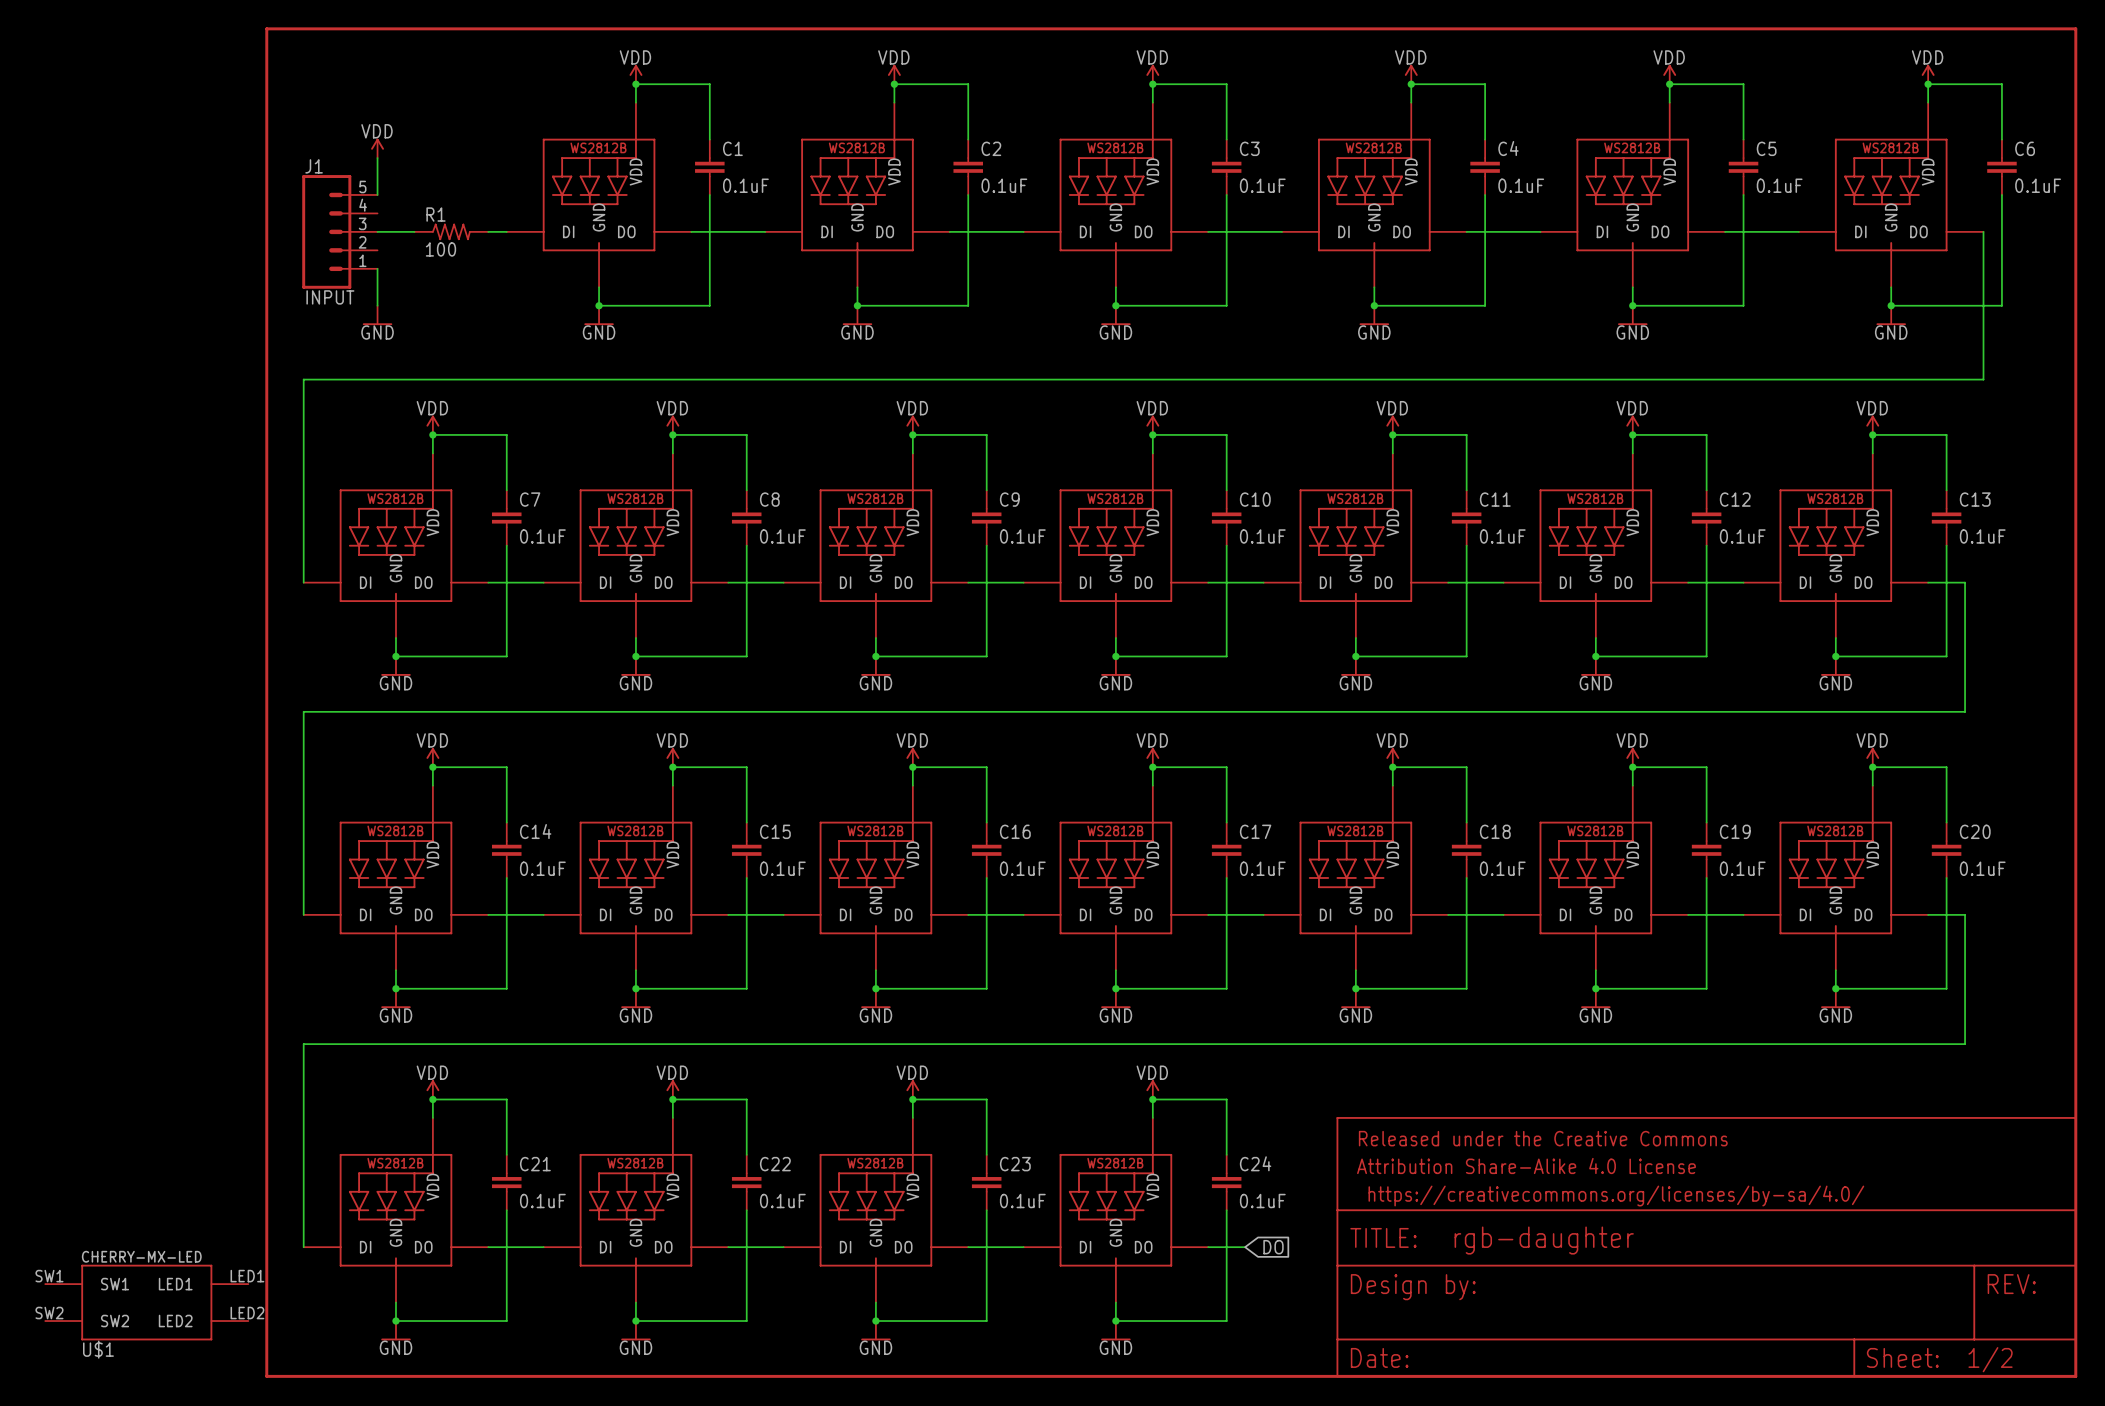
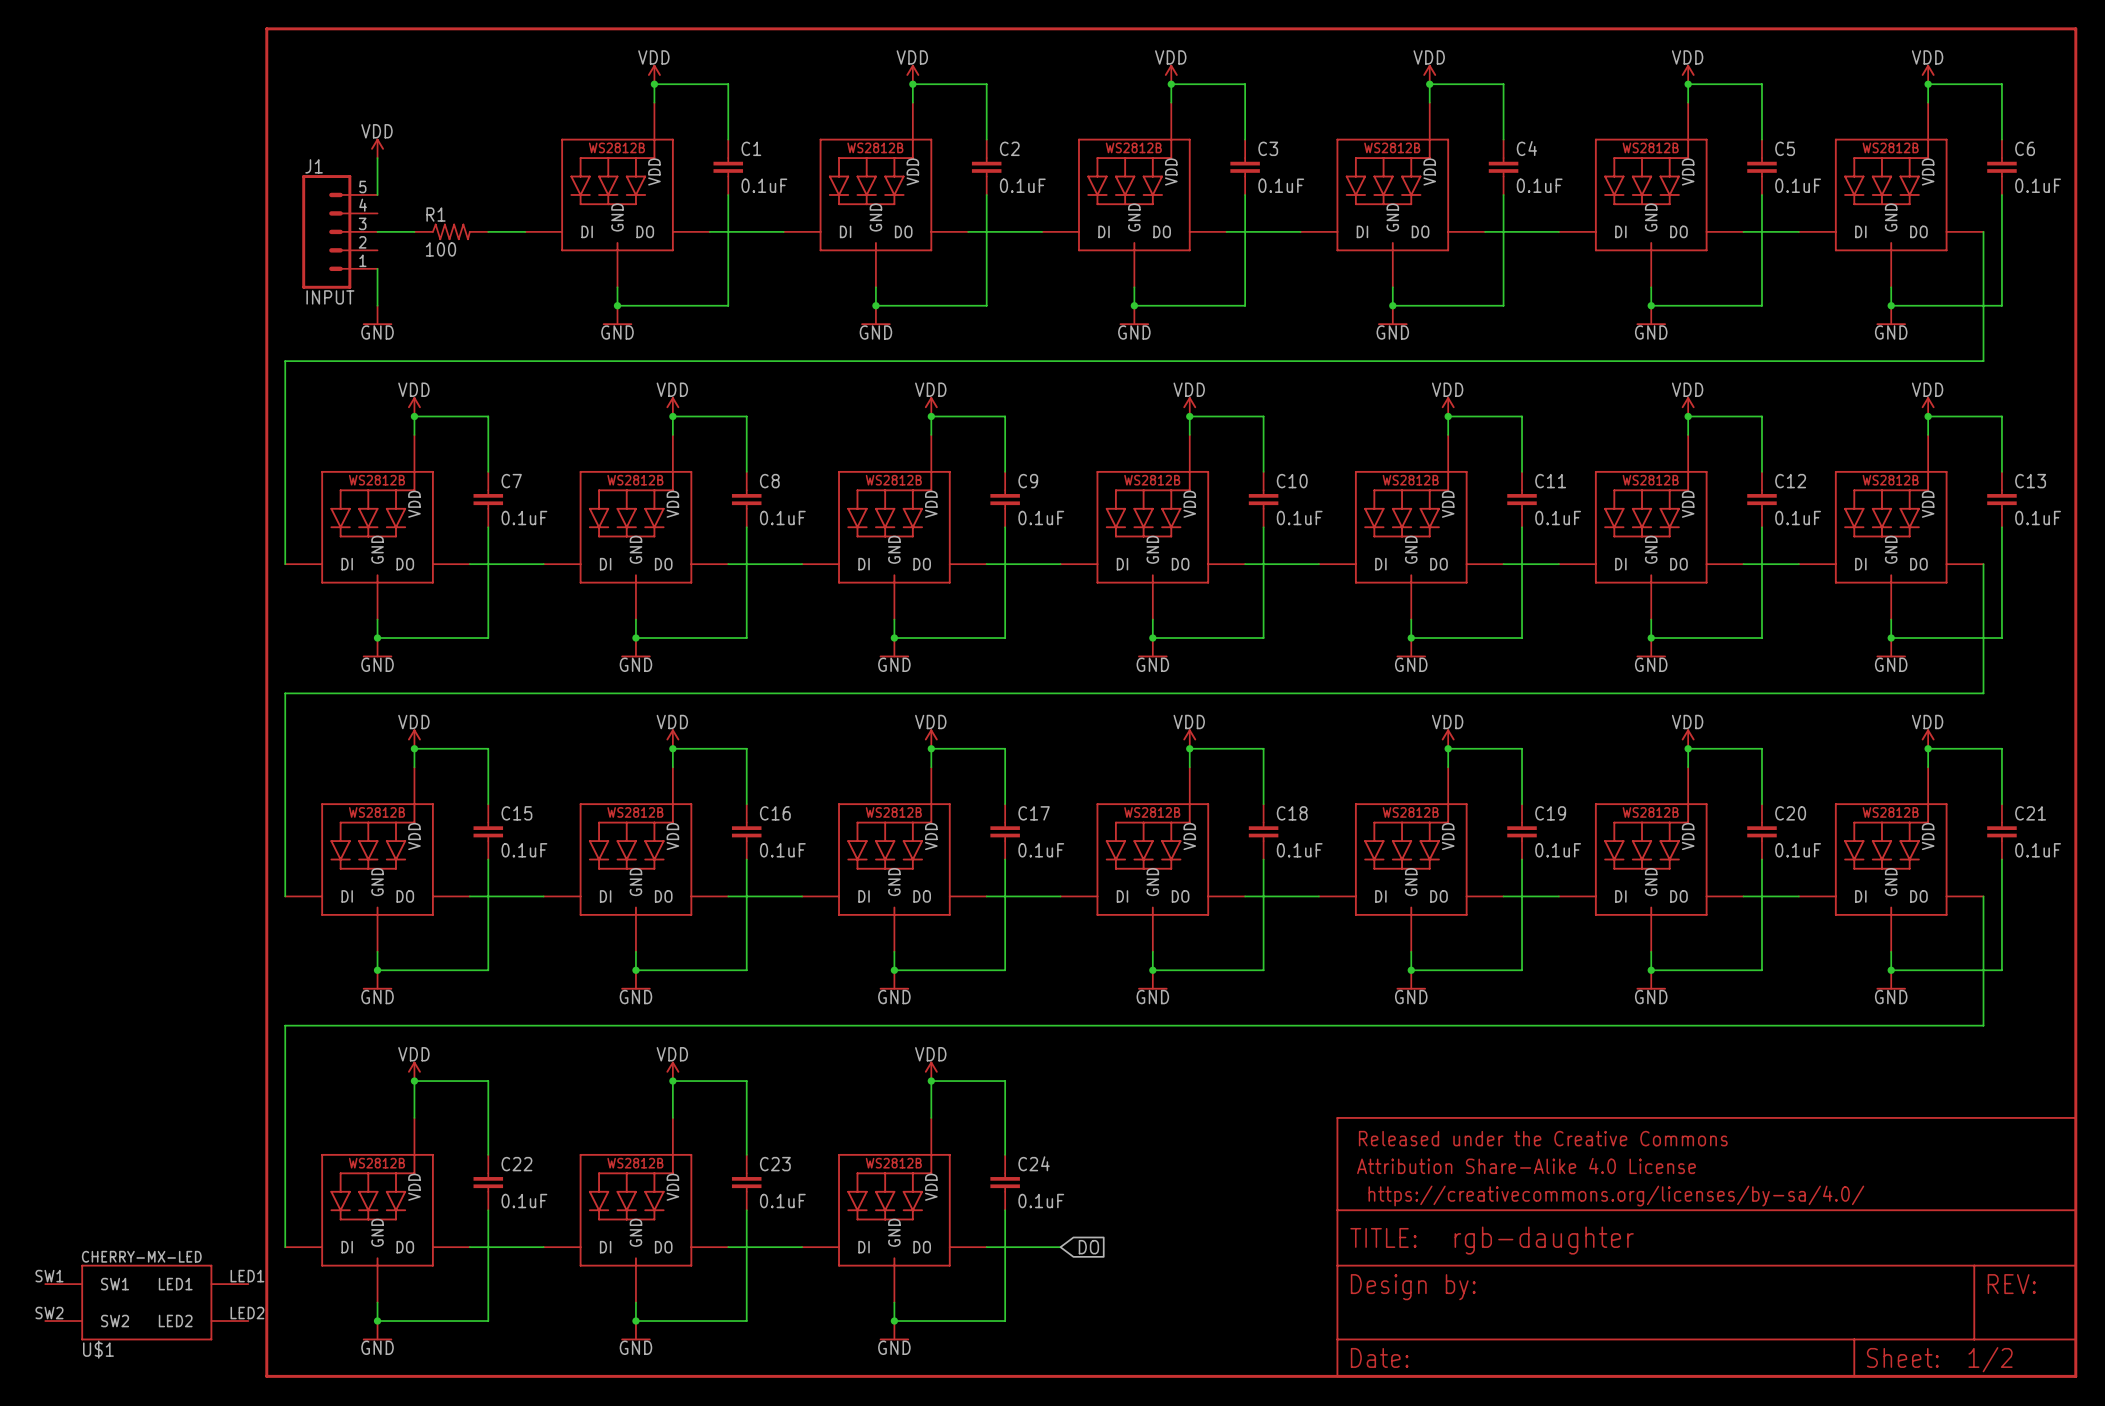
power symbol position: VDD (635, 74) -> VDD (654, 74)
power symbol position: VDD (894, 74) -> VDD (912, 74)
power symbol position: VDD (1152, 74) -> VDD (1171, 74)
power symbol position: VDD (1411, 74) -> VDD (1429, 74)
power symbol position: VDD (1669, 74) -> VDD (1688, 74)
junction position: (635, 84) -> (654, 84)
wire: (654, 84) (635, 84) (635, 102) -> (654, 84) (654, 102)
wire: (709, 84) (709, 139) -> (709, 84) (728, 84) (728, 139)
junction position: (894, 84) -> (912, 84)
wire: (912, 84) (894, 84) (894, 102) -> (912, 84) (912, 102)
wire: (968, 84) (968, 139) -> (968, 84) (986, 84) (986, 139)
junction position: (1152, 84) -> (1171, 84)
wire: (1171, 84) (1152, 84) (1152, 102) -> (1171, 84) (1171, 102)
wire: (1226, 84) (1226, 139) -> (1226, 84) (1245, 84) (1245, 139)
junction position: (1411, 84) -> (1429, 84)
wire: (1429, 84) (1411, 84) (1411, 102) -> (1429, 84) (1429, 102)
wire: (1485, 84) (1485, 139) -> (1485, 84) (1503, 84) (1503, 139)
junction position: (1669, 84) -> (1688, 84)
wire: (1688, 84) (1669, 84) (1669, 102) -> (1688, 84) (1688, 102)
wire: (1743, 84) (1743, 139) -> (1743, 84) (1761, 84) (1761, 139)
C1 position: (709, 167) -> (728, 167)
C2 position: (968, 167) -> (986, 167)
C3 position: (1226, 167) -> (1245, 167)
C4 position: (1485, 167) -> (1503, 167)
C5 position: (1743, 167) -> (1761, 167)
part position: (599, 194) -> (617, 194)
wire: (709, 194) (709, 305) -> (728, 194) (728, 305) (709, 305)
part position: (857, 194) -> (875, 194)
wire: (968, 194) (968, 305) -> (986, 194) (986, 305) (968, 305)
part position: (1115, 194) -> (1134, 194)
wire: (1226, 194) (1226, 305) -> (1245, 194) (1245, 305) (1226, 305)
part position: (1374, 194) -> (1392, 194)
wire: (1485, 194) (1485, 305) -> (1503, 194) (1503, 305) (1485, 305)
part position: (1632, 194) -> (1651, 194)
wire: (1743, 194) (1743, 305) -> (1761, 194) (1761, 305) (1743, 305)
wire: (599, 287) (599, 305) (617, 305) -> (617, 287) (617, 305)
wire: (857, 287) (857, 305) (875, 305) -> (875, 287) (875, 305)
wire: (1115, 287) (1115, 305) (1134, 305) -> (1134, 287) (1134, 305)
wire: (1374, 287) (1374, 305) (1392, 305) -> (1392, 287) (1392, 305)
wire: (1632, 287) (1632, 305) (1651, 305) -> (1651, 287) (1651, 305)
junction position: (599, 305) -> (617, 305)
junction position: (857, 305) -> (875, 305)
junction position: (1115, 305) -> (1134, 305)
junction position: (1374, 305) -> (1392, 305)
junction position: (1632, 305) -> (1651, 305)
power symbol position: GND (599, 315) -> GND (617, 315)
power symbol position: GND (857, 315) -> GND (875, 315)
power symbol position: GND (1115, 315) -> GND (1134, 315)
power symbol position: GND (1374, 315) -> GND (1392, 315)
power symbol position: GND (1632, 315) -> GND (1651, 315)
wire: (1983, 361) (1983, 379) (303, 379) (303, 582) -> (1983, 361) (285, 361) (285, 564)
junction: none -> (1448, 416)
junction: none -> (1688, 416)
junction: none -> (1928, 416)
power symbol position: VDD (432, 425) -> VDD (414, 406)
power symbol position: VDD (672, 425) -> VDD (672, 406)
power symbol position: VDD (912, 425) -> VDD (931, 406)
power symbol position: VDD (1152, 425) -> VDD (1189, 406)
power symbol position: VDD (1392, 425) -> VDD (1448, 406)
power symbol position: VDD (1632, 425) -> VDD (1688, 406)
power symbol position: VDD (1872, 425) -> VDD (1928, 406)
junction position: (432, 434) -> (414, 416)
junction position: (672, 434) -> (672, 416)
wire: (746, 434) (672, 434) (672, 453) -> (746, 434) (746, 416) (672, 416) (672, 434)
junction position: (912, 434) -> (931, 416)
junction position: (1152, 434) -> (1189, 416)
junction: (1392, 434) -> none
junction: (1632, 434) -> none
junction: (1872, 434) -> none
wire: (432, 453) (432, 434) (506, 434) (506, 490) -> (414, 434) (414, 416) (488, 416) (488, 471)
wire: (912, 453) (912, 434) (986, 434) (986, 490) -> (931, 434) (931, 416) (1005, 416) (1005, 471)
wire: (1152, 453) (1152, 434) (1226, 434) (1226, 490) -> (1189, 434) (1189, 416) (1263, 416) (1263, 471)
wire: (1392, 453) (1392, 434) (1466, 434) (1466, 490) -> (1448, 434) (1448, 416) (1522, 416) (1522, 471)
wire: (1632, 453) (1632, 434) (1706, 434) (1706, 490) -> (1688, 434) (1688, 416) (1761, 416) (1761, 471)
wire: (1872, 453) (1872, 434) (1946, 434) (1946, 490) -> (1928, 434) (1928, 416) (2001, 416) (2001, 471)
C7 position: (506, 518) -> (488, 499)
C8 position: (746, 518) -> (746, 499)
C9 position: (986, 518) -> (1005, 499)
C10 position: (1226, 518) -> (1263, 499)
C11 position: (1466, 518) -> (1522, 499)
C12 position: (1706, 518) -> (1761, 499)
C13 position: (1946, 518) -> (2001, 499)
part position: (395, 545) -> (377, 527)
wire: (506, 545) (506, 656) (395, 656) (395, 638) -> (488, 527) (488, 638) (377, 638) (377, 619)
part position: (635, 545) -> (635, 527)
part position: (875, 545) -> (894, 527)
wire: (986, 545) (986, 656) (875, 656) (875, 638) -> (1005, 527) (1005, 638) (894, 638) (894, 619)
part position: (1115, 545) -> (1152, 527)
wire: (1226, 545) (1226, 656) (1115, 656) (1115, 638) -> (1263, 527) (1263, 638) (1152, 638) (1152, 619)
part position: (1355, 545) -> (1411, 527)
wire: (1466, 545) (1466, 656) (1355, 656) (1355, 638) -> (1522, 527) (1522, 638) (1411, 638) (1411, 619)
part position: (1595, 545) -> (1651, 527)
wire: (1706, 545) (1706, 656) (1595, 656) (1595, 638) -> (1761, 527) (1761, 638) (1651, 638) (1651, 619)
part position: (1835, 545) -> (1891, 527)
wire: (1946, 545) (1946, 656) (1835, 656) (1835, 638) -> (2001, 527) (2001, 638) (1891, 638) (1891, 619)
wire: none -> (469, 564) (543, 564)
wire: none -> (728, 564) (802, 564)
wire: none -> (986, 564) (1060, 564)
wire: none -> (1245, 564) (1318, 564)
wire: none -> (1983, 564) (1983, 693) (285, 693) (285, 896)
wire: (488, 582) (543, 582) -> none
wire: (728, 582) (783, 582) -> none
wire: (968, 582) (1023, 582) -> none
wire: (1208, 582) (1263, 582) -> none
wire: (1448, 582) (1503, 582) -> (1503, 564) (1558, 564)
wire: (1688, 582) (1743, 582) -> (1743, 564) (1798, 564)
wire: (1928, 582) (1965, 582) (1965, 711) (303, 711) (303, 914) -> none
wire: (635, 638) (635, 656) (746, 656) (746, 638) -> (635, 619) (635, 638) (746, 638)
junction: none -> (1411, 638)
junction: none -> (1651, 638)
junction: none -> (1891, 638)
junction position: (395, 656) -> (377, 638)
junction position: (635, 656) -> (635, 638)
junction position: (875, 656) -> (894, 638)
junction position: (1115, 656) -> (1152, 638)
junction: (1355, 656) -> none
junction: (1595, 656) -> none
junction: (1835, 656) -> none
power symbol position: GND (395, 666) -> GND (377, 647)
power symbol position: GND (635, 666) -> GND (635, 647)
power symbol position: GND (875, 666) -> GND (894, 647)
power symbol position: GND (1115, 666) -> GND (1152, 647)
power symbol position: GND (1355, 666) -> GND (1411, 647)
power symbol position: GND (1595, 666) -> GND (1651, 647)
power symbol position: GND (1835, 666) -> GND (1891, 647)
junction: none -> (1448, 748)
junction: none -> (1688, 748)
junction: none -> (1928, 748)
power symbol position: VDD (432, 757) -> VDD (414, 739)
power symbol position: VDD (672, 757) -> VDD (672, 739)
power symbol position: VDD (912, 757) -> VDD (931, 739)
power symbol position: VDD (1152, 757) -> VDD (1189, 739)
power symbol position: VDD (1392, 757) -> VDD (1448, 739)
power symbol position: VDD (1632, 757) -> VDD (1688, 739)
power symbol position: VDD (1872, 757) -> VDD (1928, 739)
junction position: (432, 767) -> (414, 748)
junction position: (672, 767) -> (672, 748)
wire: (746, 767) (672, 767) (672, 785) -> (746, 767) (746, 748) (672, 748) (672, 767)
junction position: (912, 767) -> (931, 748)
junction position: (1152, 767) -> (1189, 748)
junction: (1392, 767) -> none
junction: (1632, 767) -> none
junction: (1872, 767) -> none
wire: (432, 785) (432, 767) (506, 767) (506, 822) -> (414, 767) (414, 748) (488, 748) (488, 804)
wire: (912, 785) (912, 767) (986, 767) (986, 822) -> (931, 767) (931, 748) (1005, 748) (1005, 804)
wire: (1152, 785) (1152, 767) (1226, 767) (1226, 822) -> (1189, 767) (1189, 748) (1263, 748) (1263, 804)
wire: (1392, 785) (1392, 767) (1466, 767) (1466, 822) -> (1448, 767) (1448, 748) (1522, 748) (1522, 804)
wire: (1632, 785) (1632, 767) (1706, 767) (1706, 822) -> (1688, 767) (1688, 748) (1761, 748) (1761, 804)
wire: (1872, 785) (1872, 767) (1946, 767) (1946, 822) -> (1928, 767) (1928, 748) (2001, 748) (2001, 804)
C14: 0.1uF (506, 850) -> none
C15 position: (746, 850) -> (488, 831)
C16 position: (986, 850) -> (746, 831)
C17 position: (1226, 850) -> (1005, 831)
C18 position: (1466, 850) -> (1263, 831)
C19 position: (1706, 850) -> (1522, 831)
C20 position: (1946, 850) -> (1761, 831)
part position: (395, 877) -> (377, 859)
wire: (506, 877) (506, 988) (395, 988) (395, 970) -> (488, 859) (488, 970) (377, 970) (377, 951)
part position: (635, 877) -> (635, 859)
part position: (875, 877) -> (894, 859)
wire: (986, 877) (986, 988) (875, 988) (875, 970) -> (1005, 859) (1005, 970) (894, 970) (894, 951)
part position: (1115, 877) -> (1152, 859)
wire: (1226, 877) (1226, 988) (1115, 988) (1115, 970) -> (1263, 859) (1263, 970) (1152, 970) (1152, 951)
part position: (1355, 877) -> (1411, 859)
wire: (1466, 877) (1466, 988) (1355, 988) (1355, 970) -> (1522, 859) (1522, 970) (1411, 970) (1411, 951)
part position: (1595, 877) -> (1651, 859)
wire: (1706, 877) (1706, 988) (1595, 988) (1595, 970) -> (1761, 859) (1761, 970) (1651, 970) (1651, 951)
part position: (1835, 877) -> (1891, 859)
wire: (1946, 877) (1946, 988) (1835, 988) (1835, 970) -> (2001, 859) (2001, 970) (1891, 970) (1891, 951)
wire: none -> (469, 896) (543, 896)
wire: none -> (728, 896) (802, 896)
wire: none -> (986, 896) (1060, 896)
wire: none -> (1245, 896) (1318, 896)
wire: none -> (1983, 896) (1983, 1025) (285, 1025) (285, 1247)
wire: (488, 914) (543, 914) -> none
wire: (728, 914) (783, 914) -> none
wire: (968, 914) (1023, 914) -> none
wire: (1208, 914) (1263, 914) -> none
wire: (1448, 914) (1503, 914) -> (1503, 896) (1558, 896)
wire: (1688, 914) (1743, 914) -> (1743, 896) (1798, 896)
wire: (1928, 914) (1965, 914) (1965, 1044) (303, 1044) (303, 1247) -> none
wire: (635, 970) (635, 988) (746, 988) (746, 970) -> (635, 951) (635, 970) (746, 970)
junction: none -> (1411, 970)
junction: none -> (1651, 970)
junction: none -> (1891, 970)
junction position: (395, 988) -> (377, 970)
junction position: (635, 988) -> (635, 970)
junction position: (875, 988) -> (894, 970)
junction position: (1115, 988) -> (1152, 970)
junction: (1355, 988) -> none
junction: (1595, 988) -> none
junction: (1835, 988) -> none
power symbol position: GND (395, 998) -> GND (377, 979)
power symbol position: GND (635, 998) -> GND (635, 979)
power symbol position: GND (875, 998) -> GND (894, 979)
power symbol position: GND (1115, 998) -> GND (1152, 979)
power symbol position: GND (1355, 998) -> GND (1411, 979)
power symbol position: GND (1595, 998) -> GND (1651, 979)
power symbol position: GND (1835, 998) -> GND (1891, 979)
power symbol position: VDD (432, 1089) -> VDD (414, 1071)
power symbol position: VDD (672, 1089) -> VDD (672, 1071)
power symbol position: VDD (912, 1089) -> VDD (931, 1071)
power symbol: VDD (1152, 1089) -> none
junction position: (432, 1099) -> (414, 1081)
wire: (672, 1099) (746, 1099) -> (672, 1099) (672, 1081) (746, 1081) (746, 1099)
junction position: (672, 1099) -> (672, 1081)
junction position: (912, 1099) -> (931, 1081)
junction: (1152, 1099) -> none
wire: none -> (414, 1117) (414, 1081) (488, 1081) (488, 1154)
wire: (432, 1117) (432, 1099) (506, 1099) (506, 1154) -> none
wire: (912, 1117) (912, 1099) (986, 1099) (986, 1154) -> none
wire: none -> (931, 1117) (931, 1081) (1005, 1081) (1005, 1154)
wire: (1152, 1117) (1152, 1099) (1226, 1099) (1226, 1154) -> none
C22 name: C22 (775, 1164) -> C23 (775, 1164)
C22: none -> 0.1uF (488, 1182)
C21 position: (506, 1182) -> (2001, 831)
C23: 0.1uF (986, 1182) -> none
C24 position: (1226, 1182) -> (1005, 1182)
part position: (395, 1210) -> (377, 1210)
wire: (506, 1210) (506, 1321) (488, 1321) -> (488, 1210) (488, 1321)
part position: (875, 1210) -> (894, 1210)
wire: (986, 1210) (986, 1321) -> (1005, 1210) (1005, 1321) (986, 1321)
part: (1115, 1210) -> none
wire: (1226, 1210) (1226, 1321) (1115, 1321) (1115, 1302) -> none
global label: none -> DO (1088, 1247)
wire: (1208, 1247) (1245, 1247) -> none
global label: DO (1273, 1247) -> none
wire: (395, 1302) (395, 1321) -> (377, 1302) (377, 1321) (395, 1321)
wire: (875, 1302) (875, 1321) (894, 1321) -> (894, 1302) (894, 1321)
junction position: (395, 1321) -> (377, 1321)
junction position: (875, 1321) -> (894, 1321)
junction: (1115, 1321) -> none
power symbol position: GND (395, 1330) -> GND (377, 1330)
power symbol position: GND (875, 1330) -> GND (894, 1330)
power symbol: GND (1115, 1330) -> none

